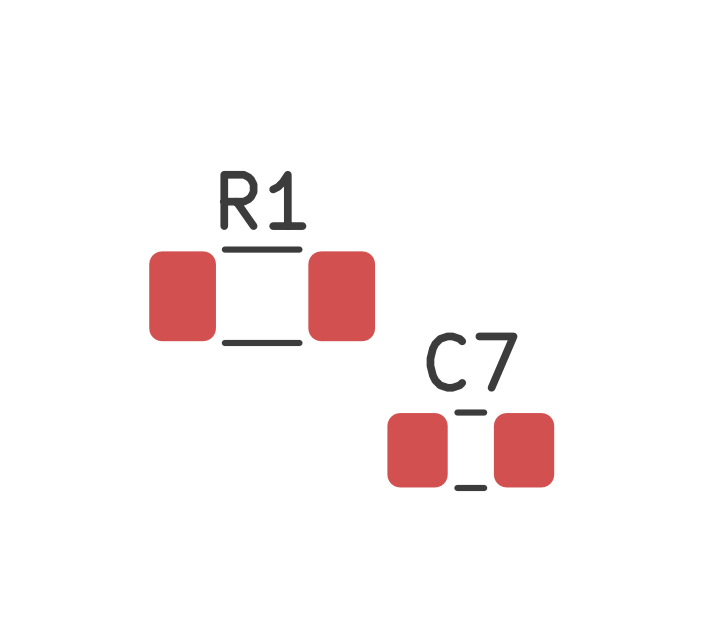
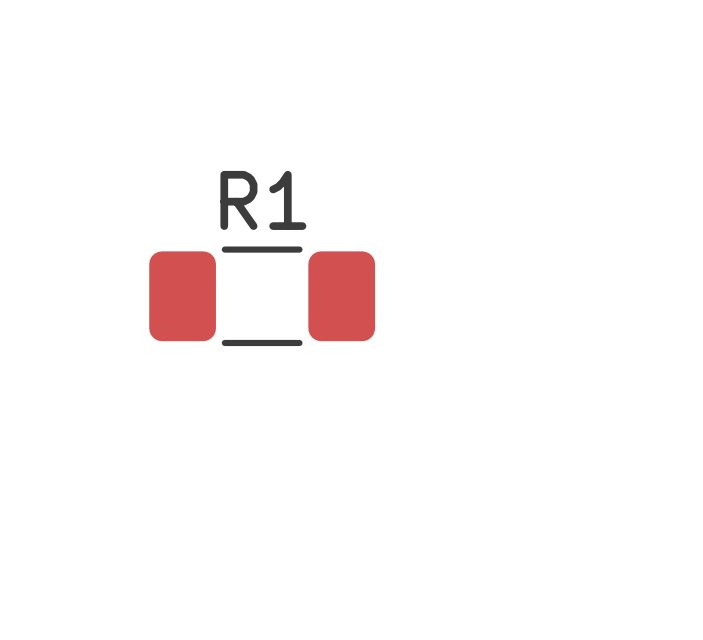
C7: (470, 450) -> none

